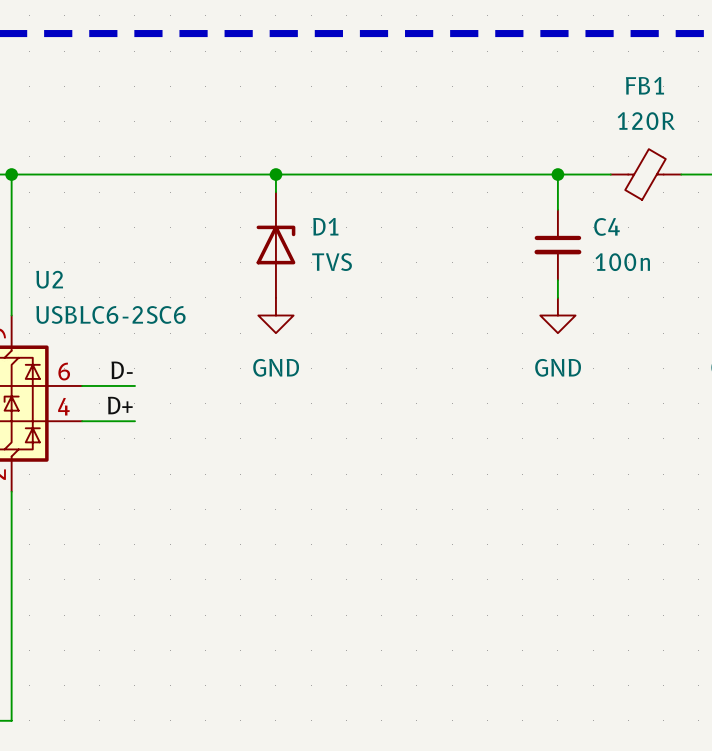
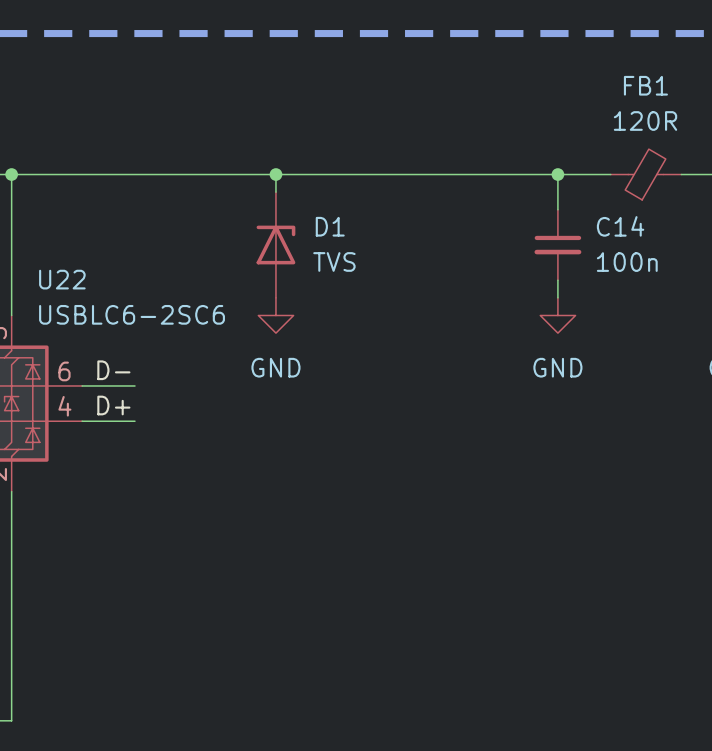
C4 name: C4 (607, 226) -> C14 (620, 226)
U2 name: U2 (49, 279) -> U22 (62, 279)

